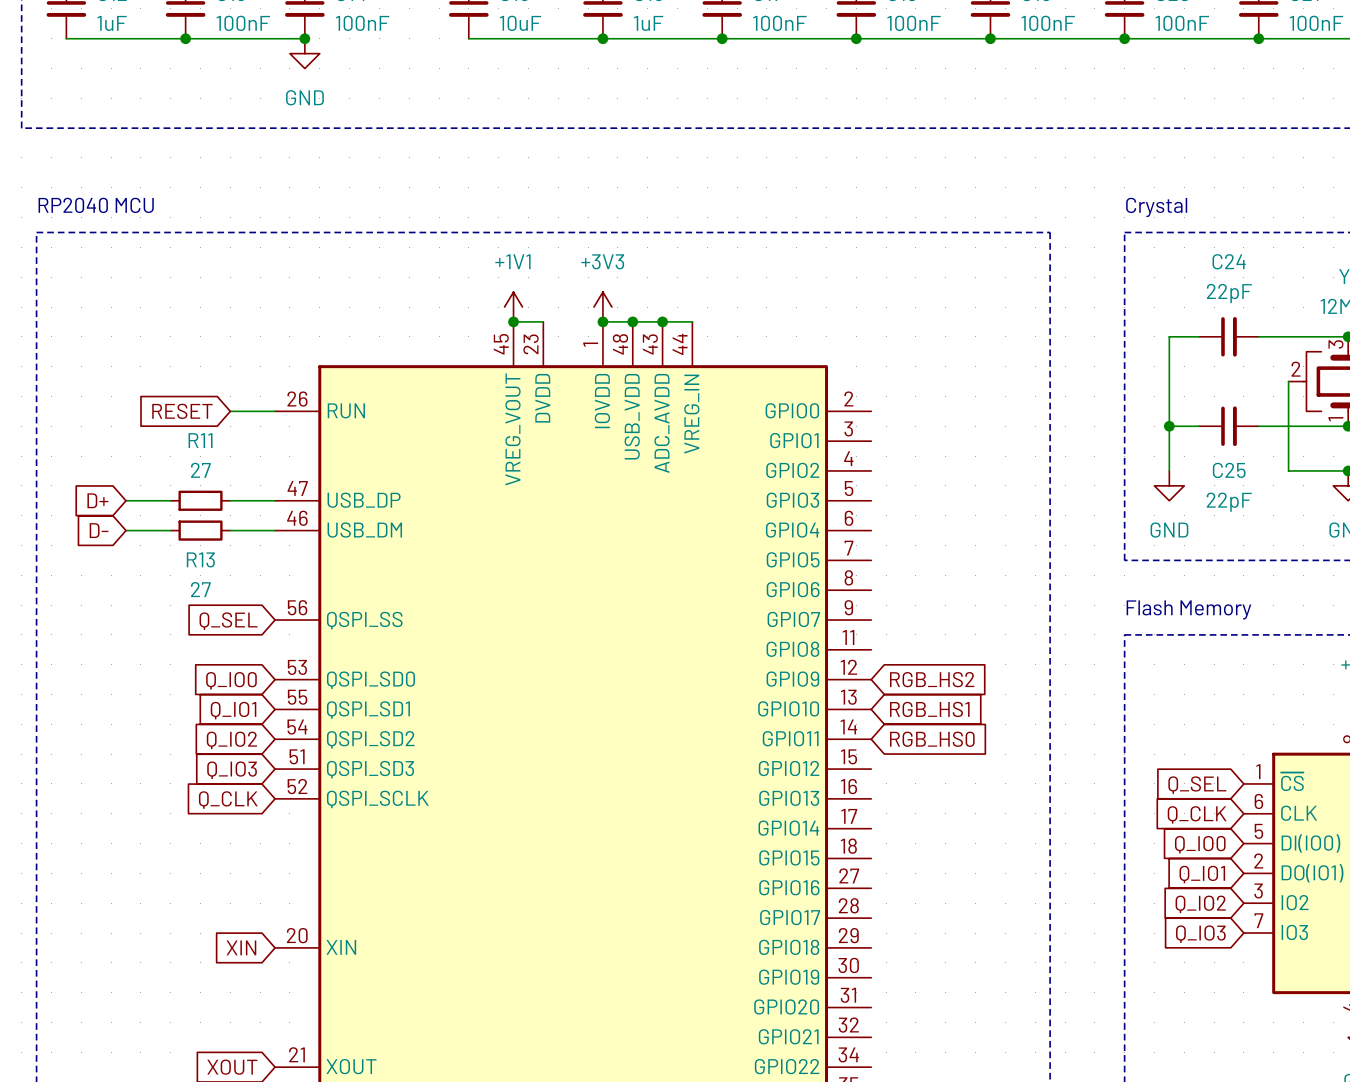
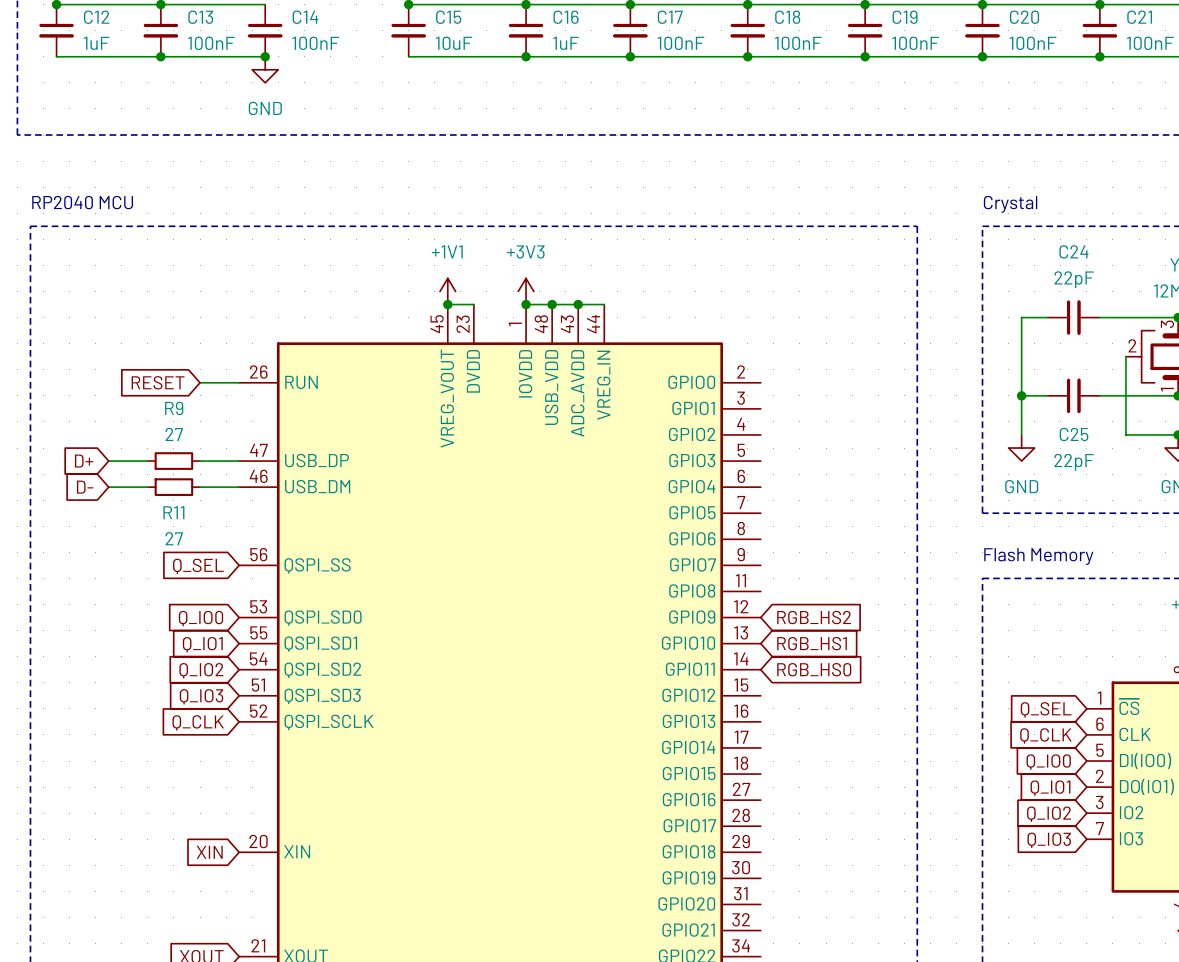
R11 name: R11 (200, 440) -> R9 (174, 408)
R13 name: R13 (200, 559) -> R11 (173, 512)

